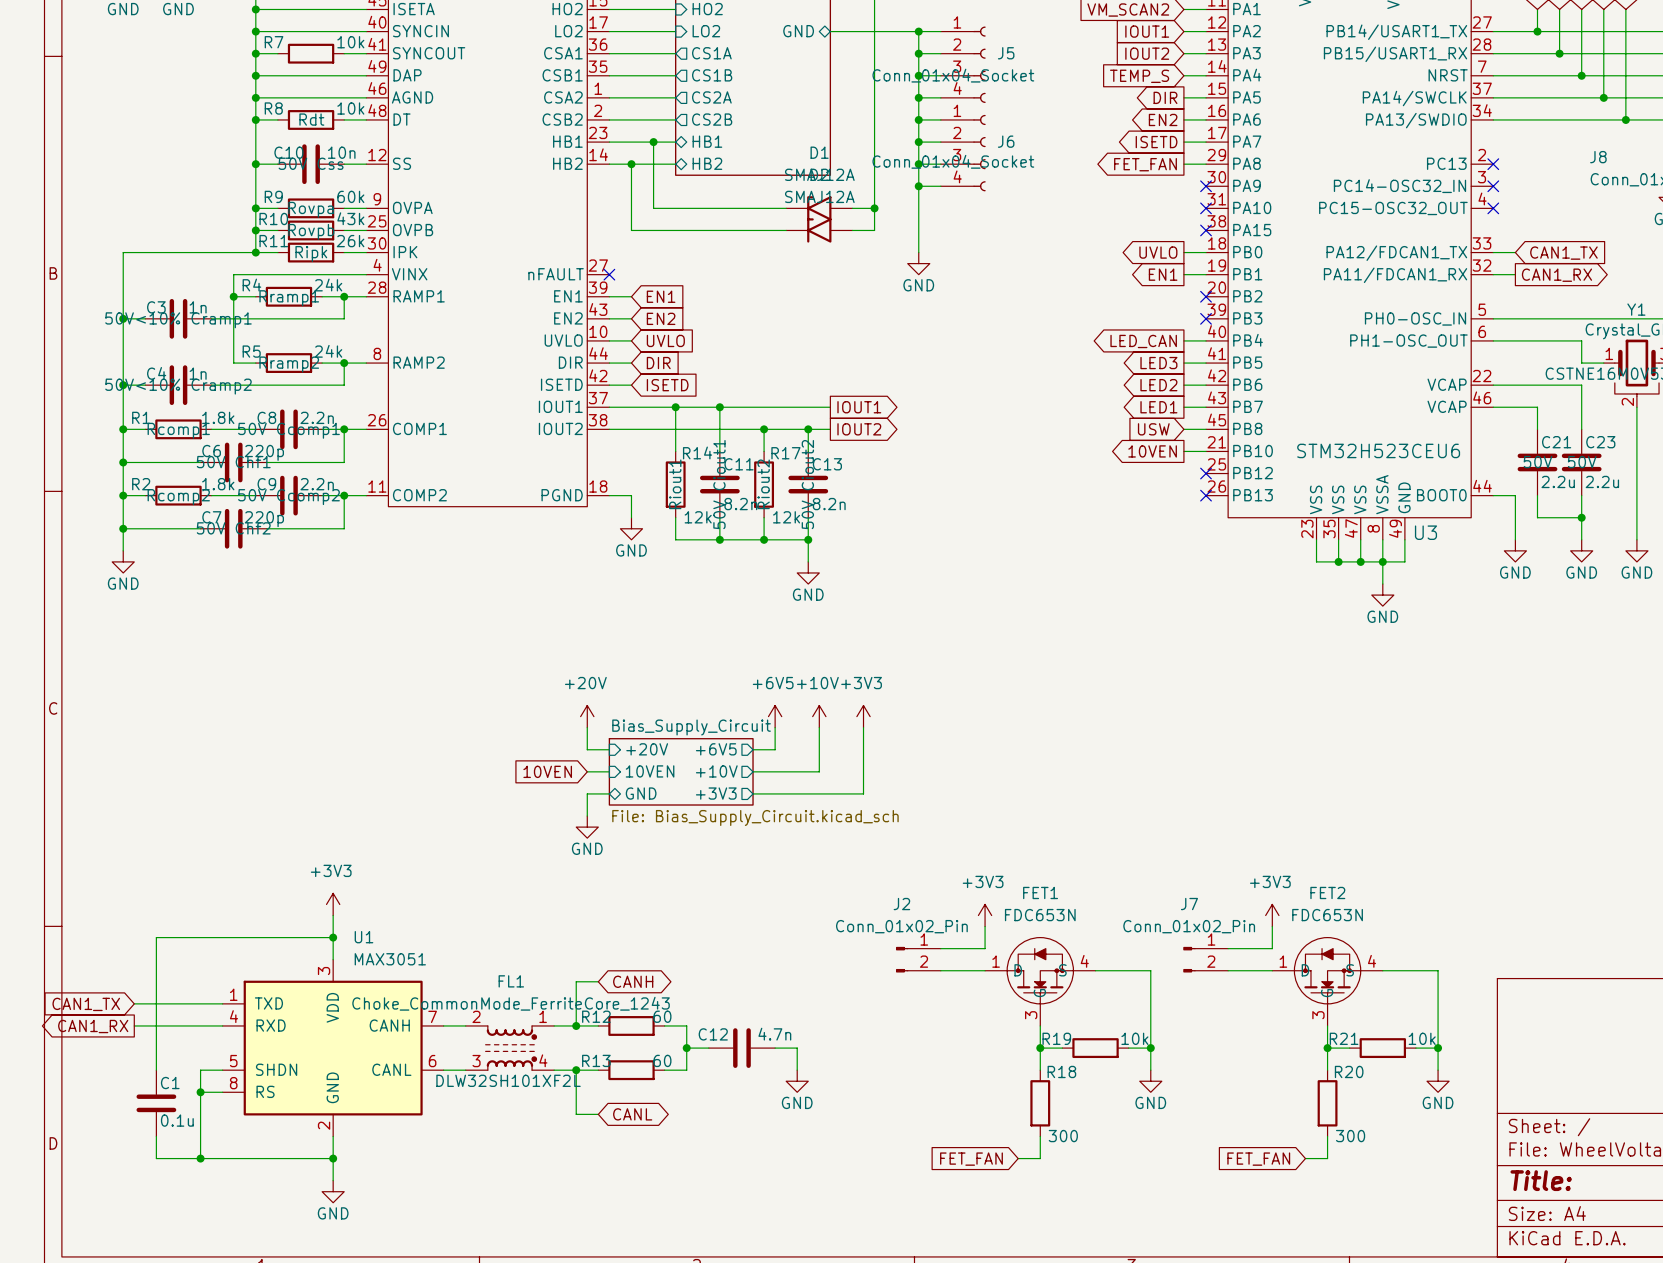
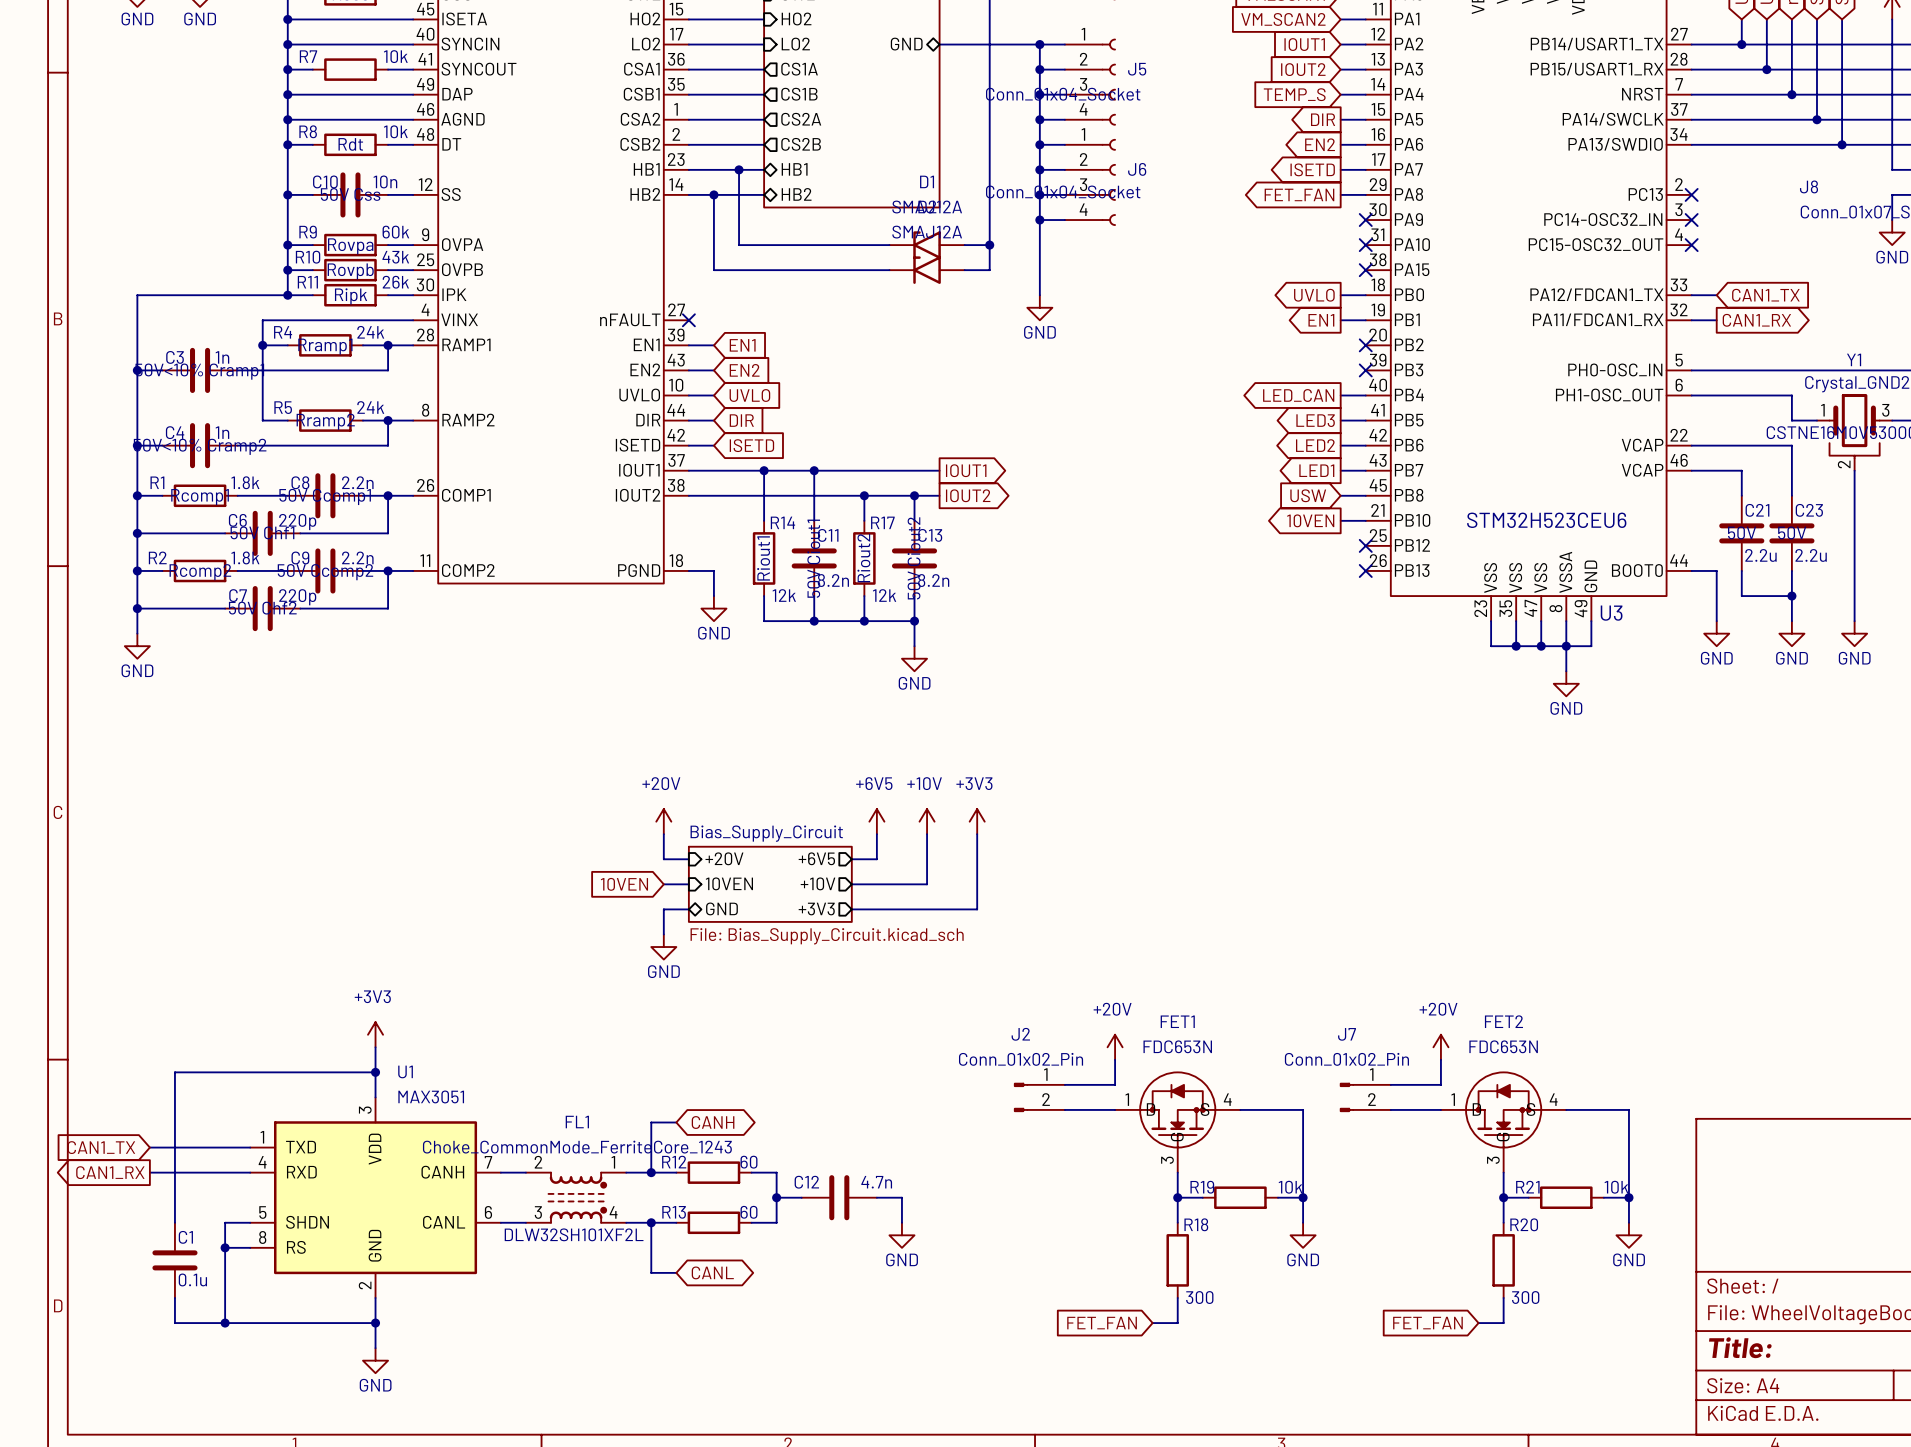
power symbol: +3V3 (985, 915) -> +20V (1115, 1047)
power symbol: +3V3 (1272, 915) -> +20V (1440, 1047)

